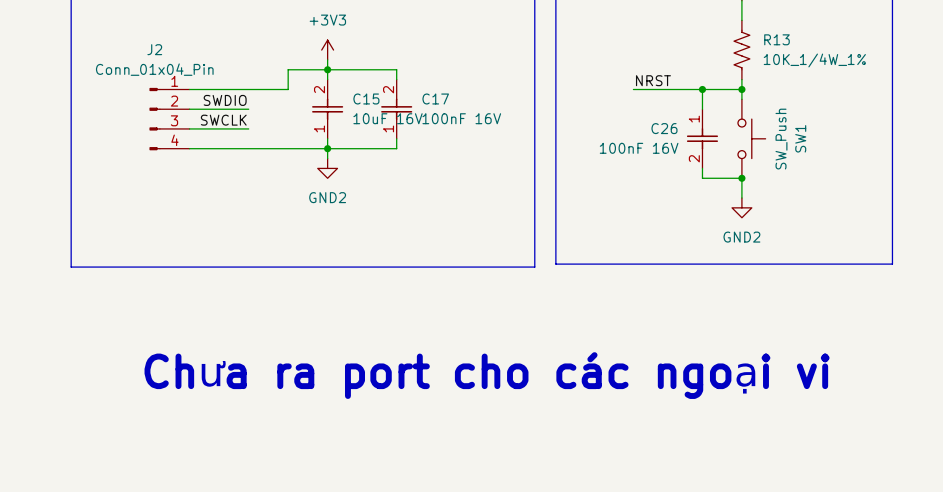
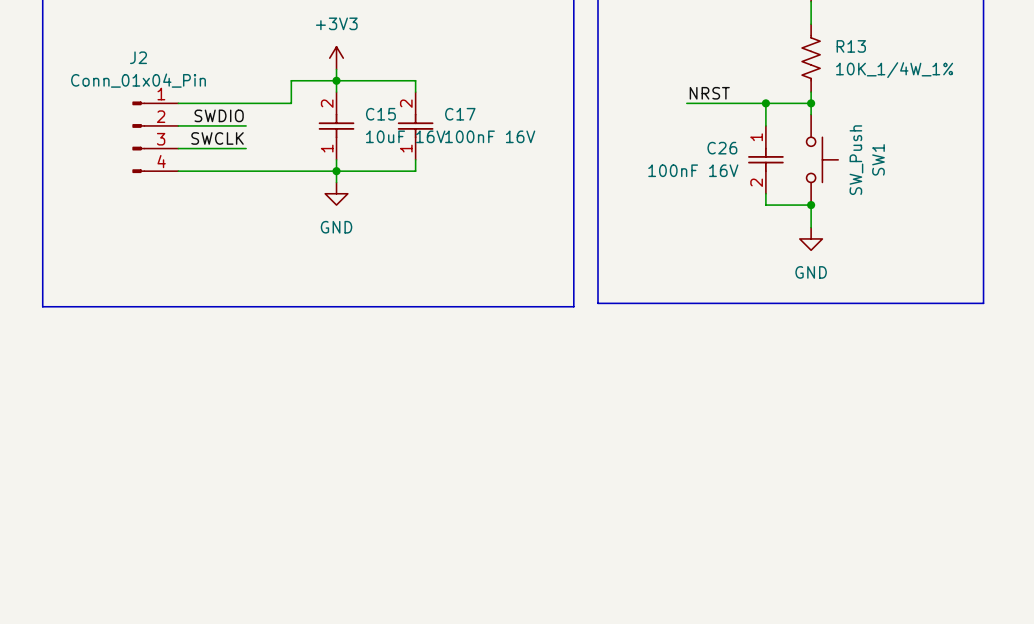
power symbol: GND2 (327, 168) -> GND (336, 193)
power symbol: GND2 (741, 207) -> GND (811, 238)
text: Chưa ra port cho các ngoại vi (487, 375) -> none

